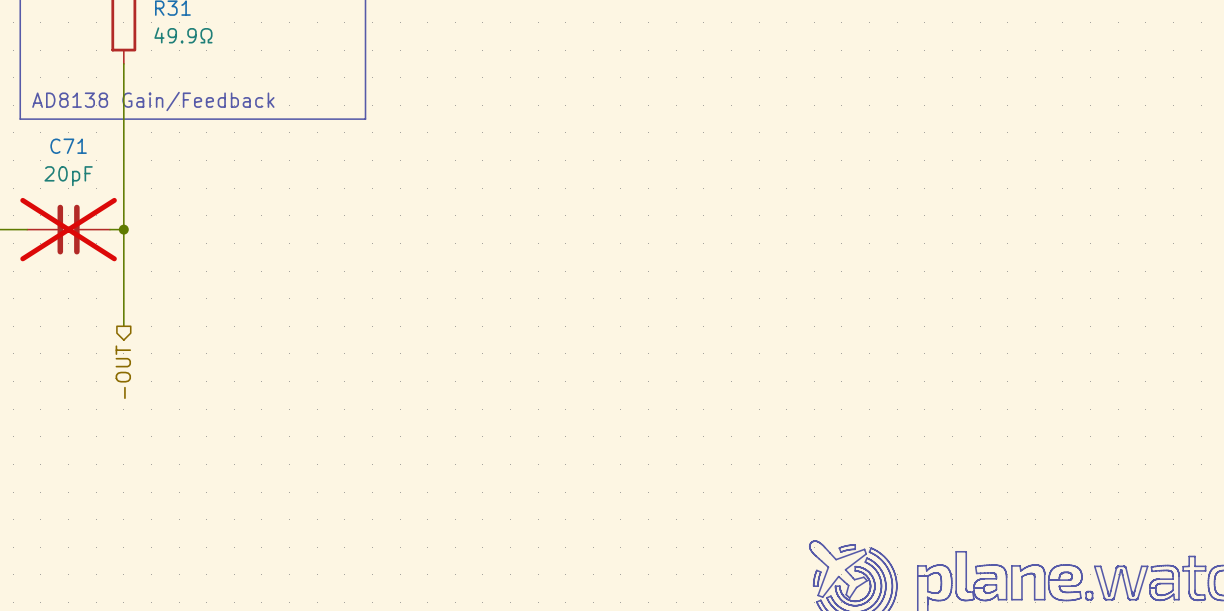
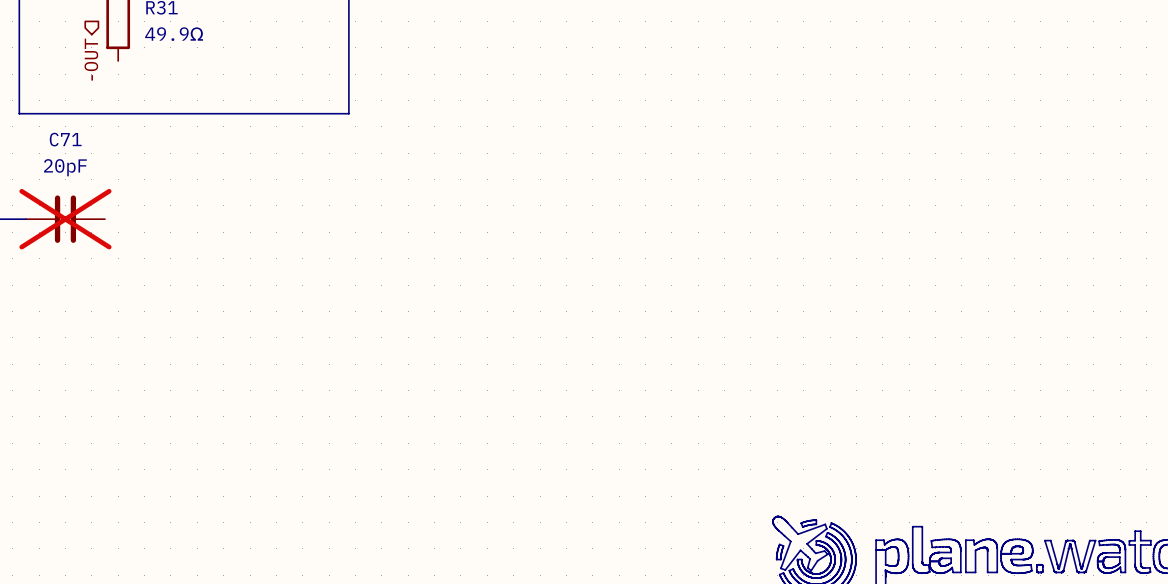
wire: (123, 63) (123, 326) -> none
hierarchical label: none -> -OUT (91, 59)
text: AD8138 Gain/Feedback (153, 101) -> none
wire: (110, 229) (123, 229) -> none
junction: (123, 229) -> none
hierarchical label: -OUT (123, 372) -> none

